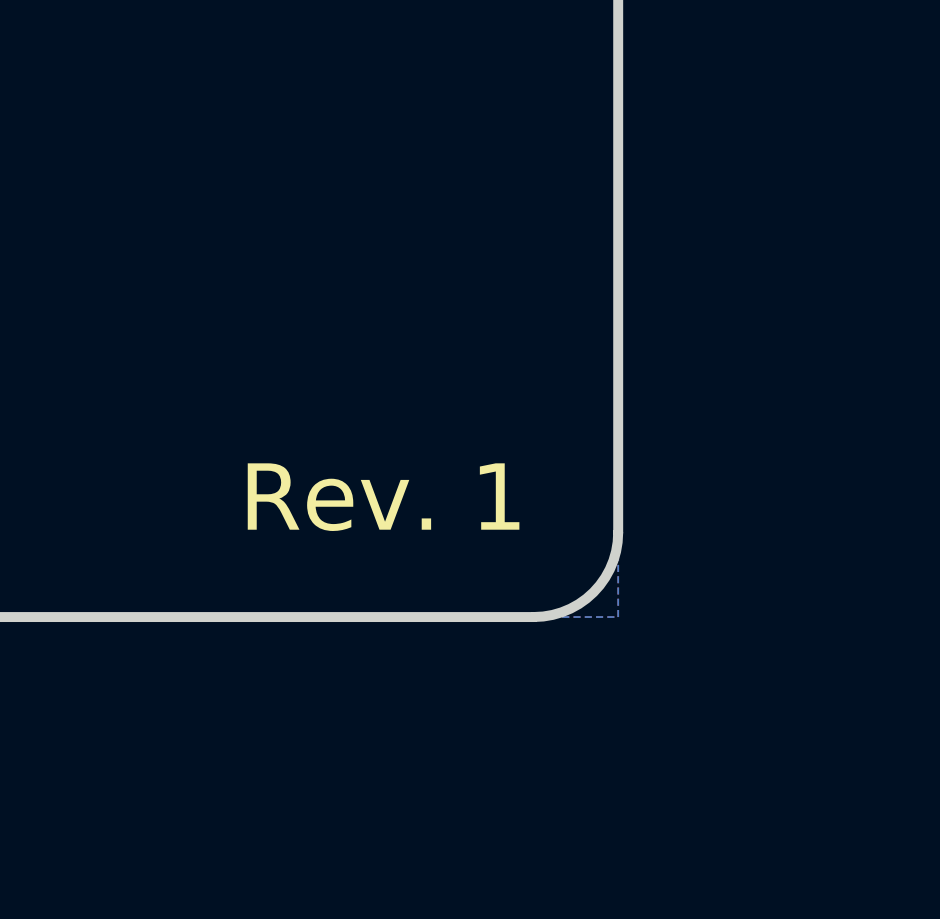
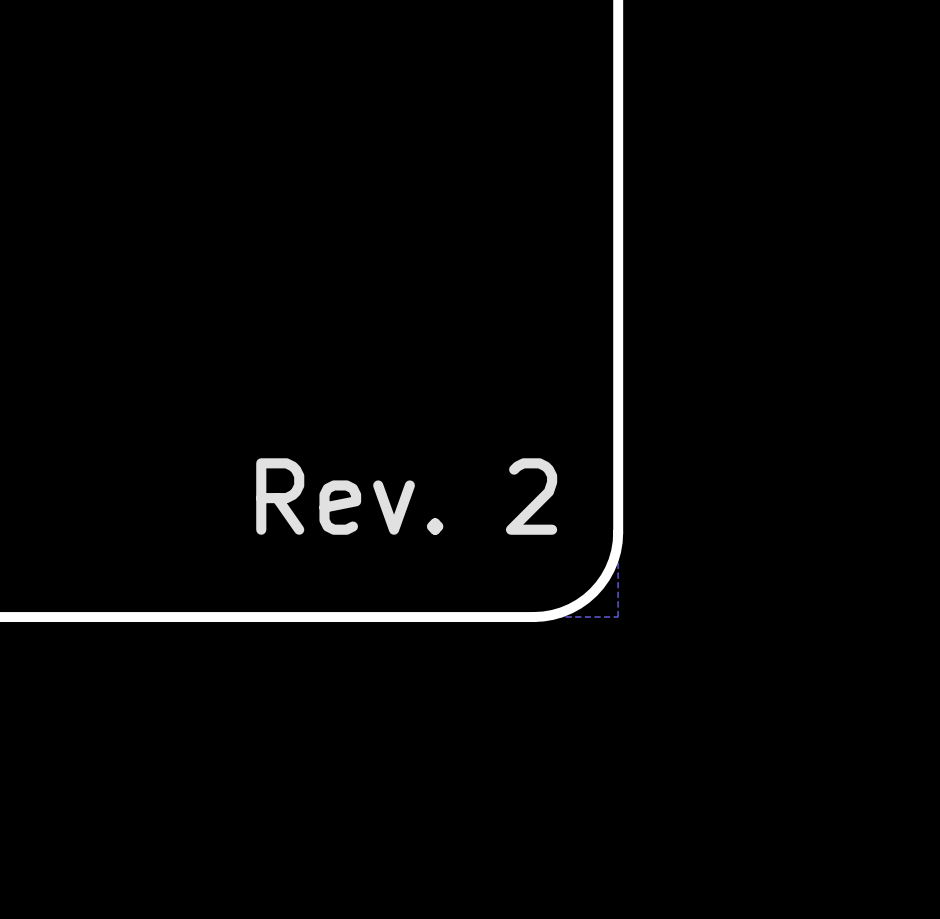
text: Rev. 1 (383, 497) -> Rev. 2 (406, 496)

